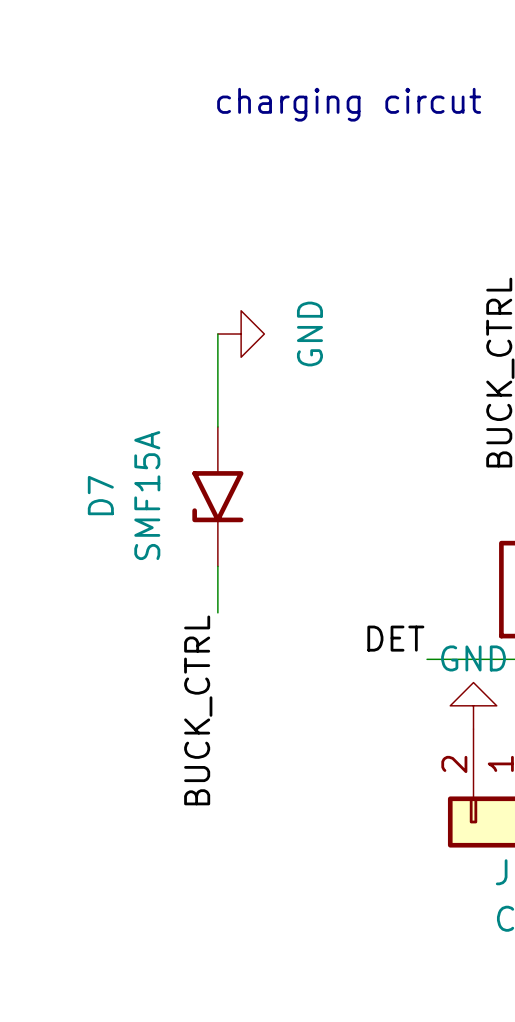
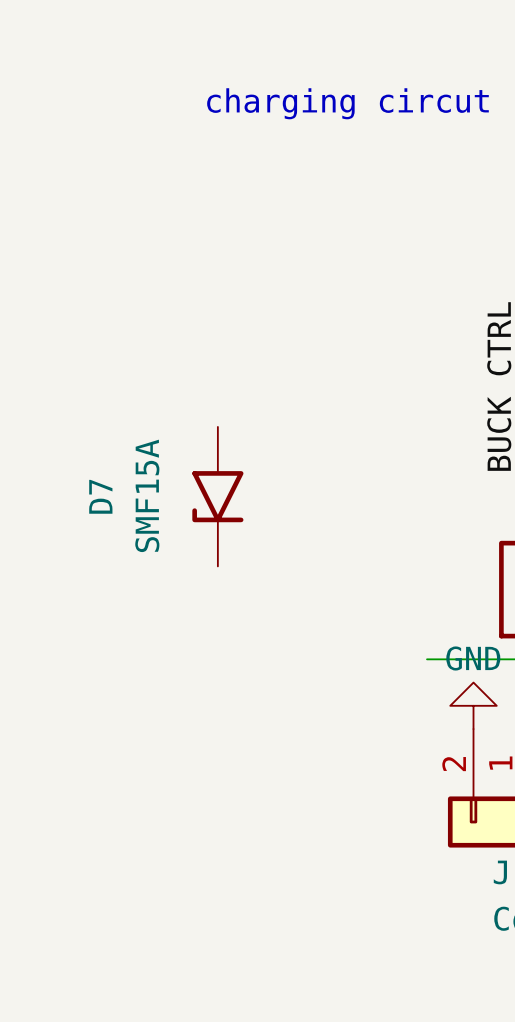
wire: (217, 334) (217, 426) -> none
power symbol: GND (241, 334) -> none
wire: (217, 566) (217, 612) -> none
label: DET (395, 638) -> none
label: BUCK_CTRL (198, 710) -> none

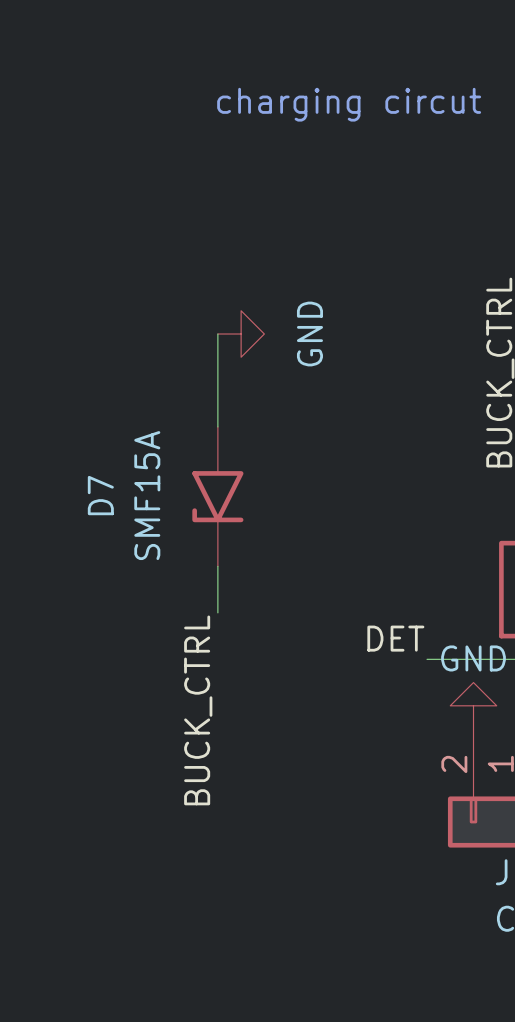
wire: none -> (217, 334) (217, 426)
power symbol: none -> GND (241, 334)
wire: none -> (217, 566) (217, 612)
label: none -> DET (395, 638)
label: none -> BUCK_CTRL (198, 710)

